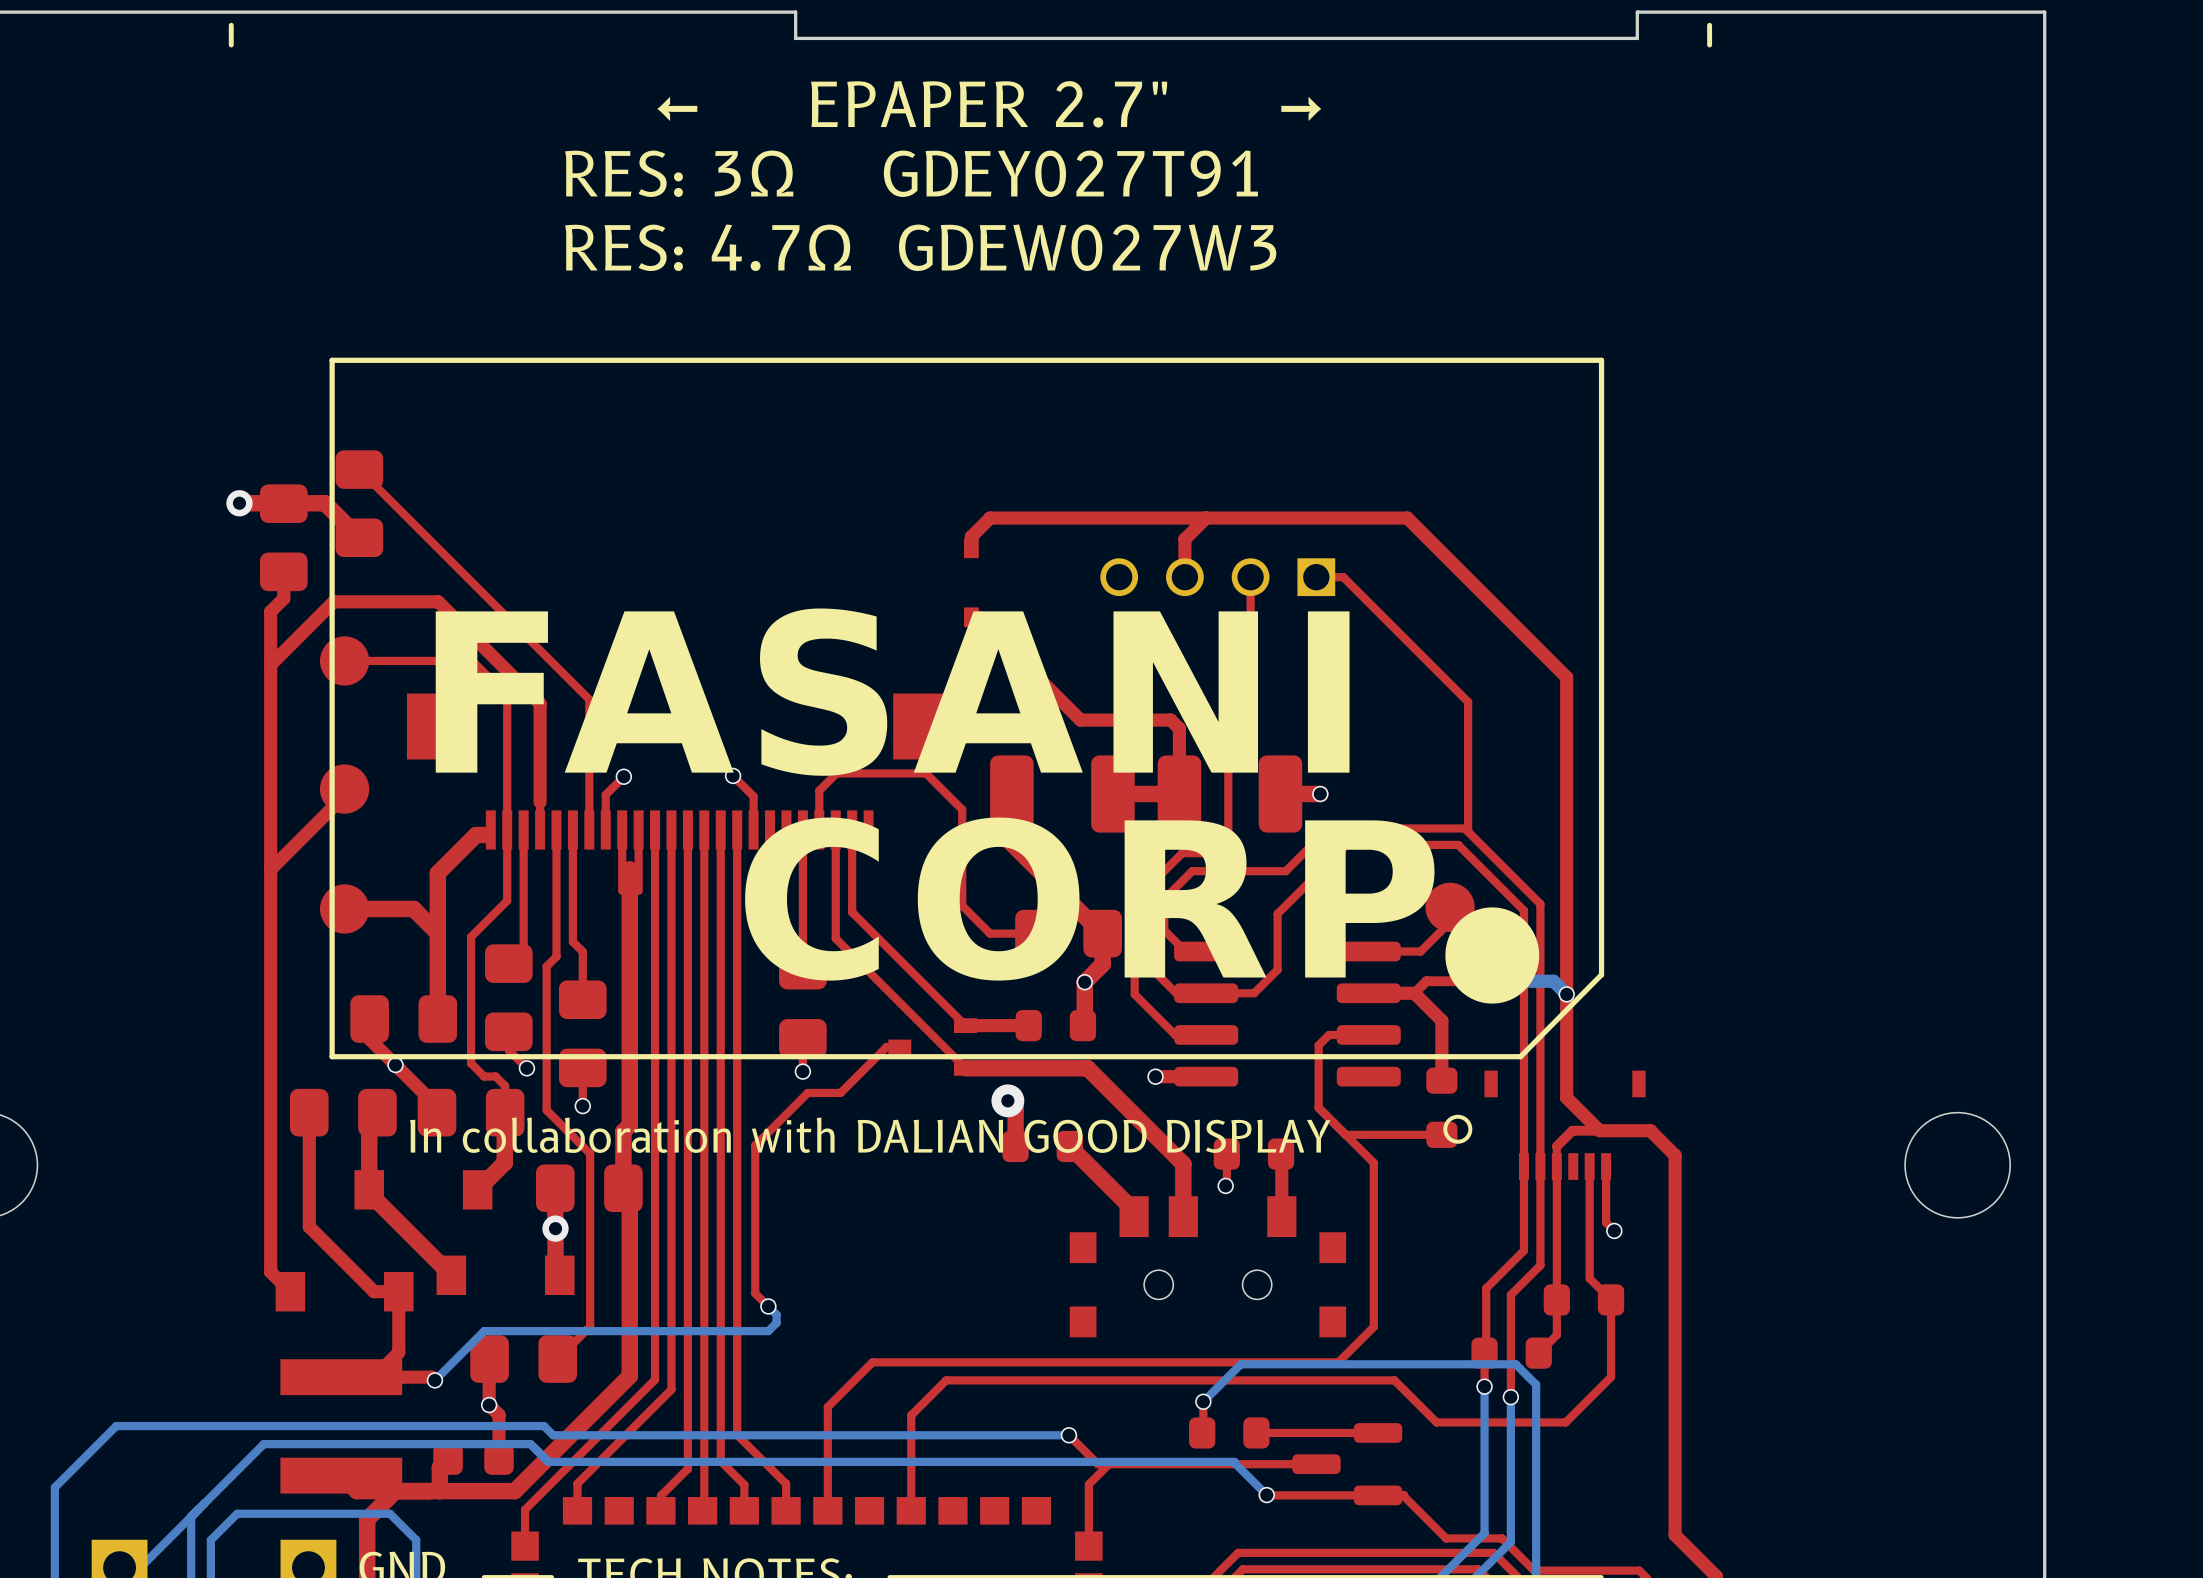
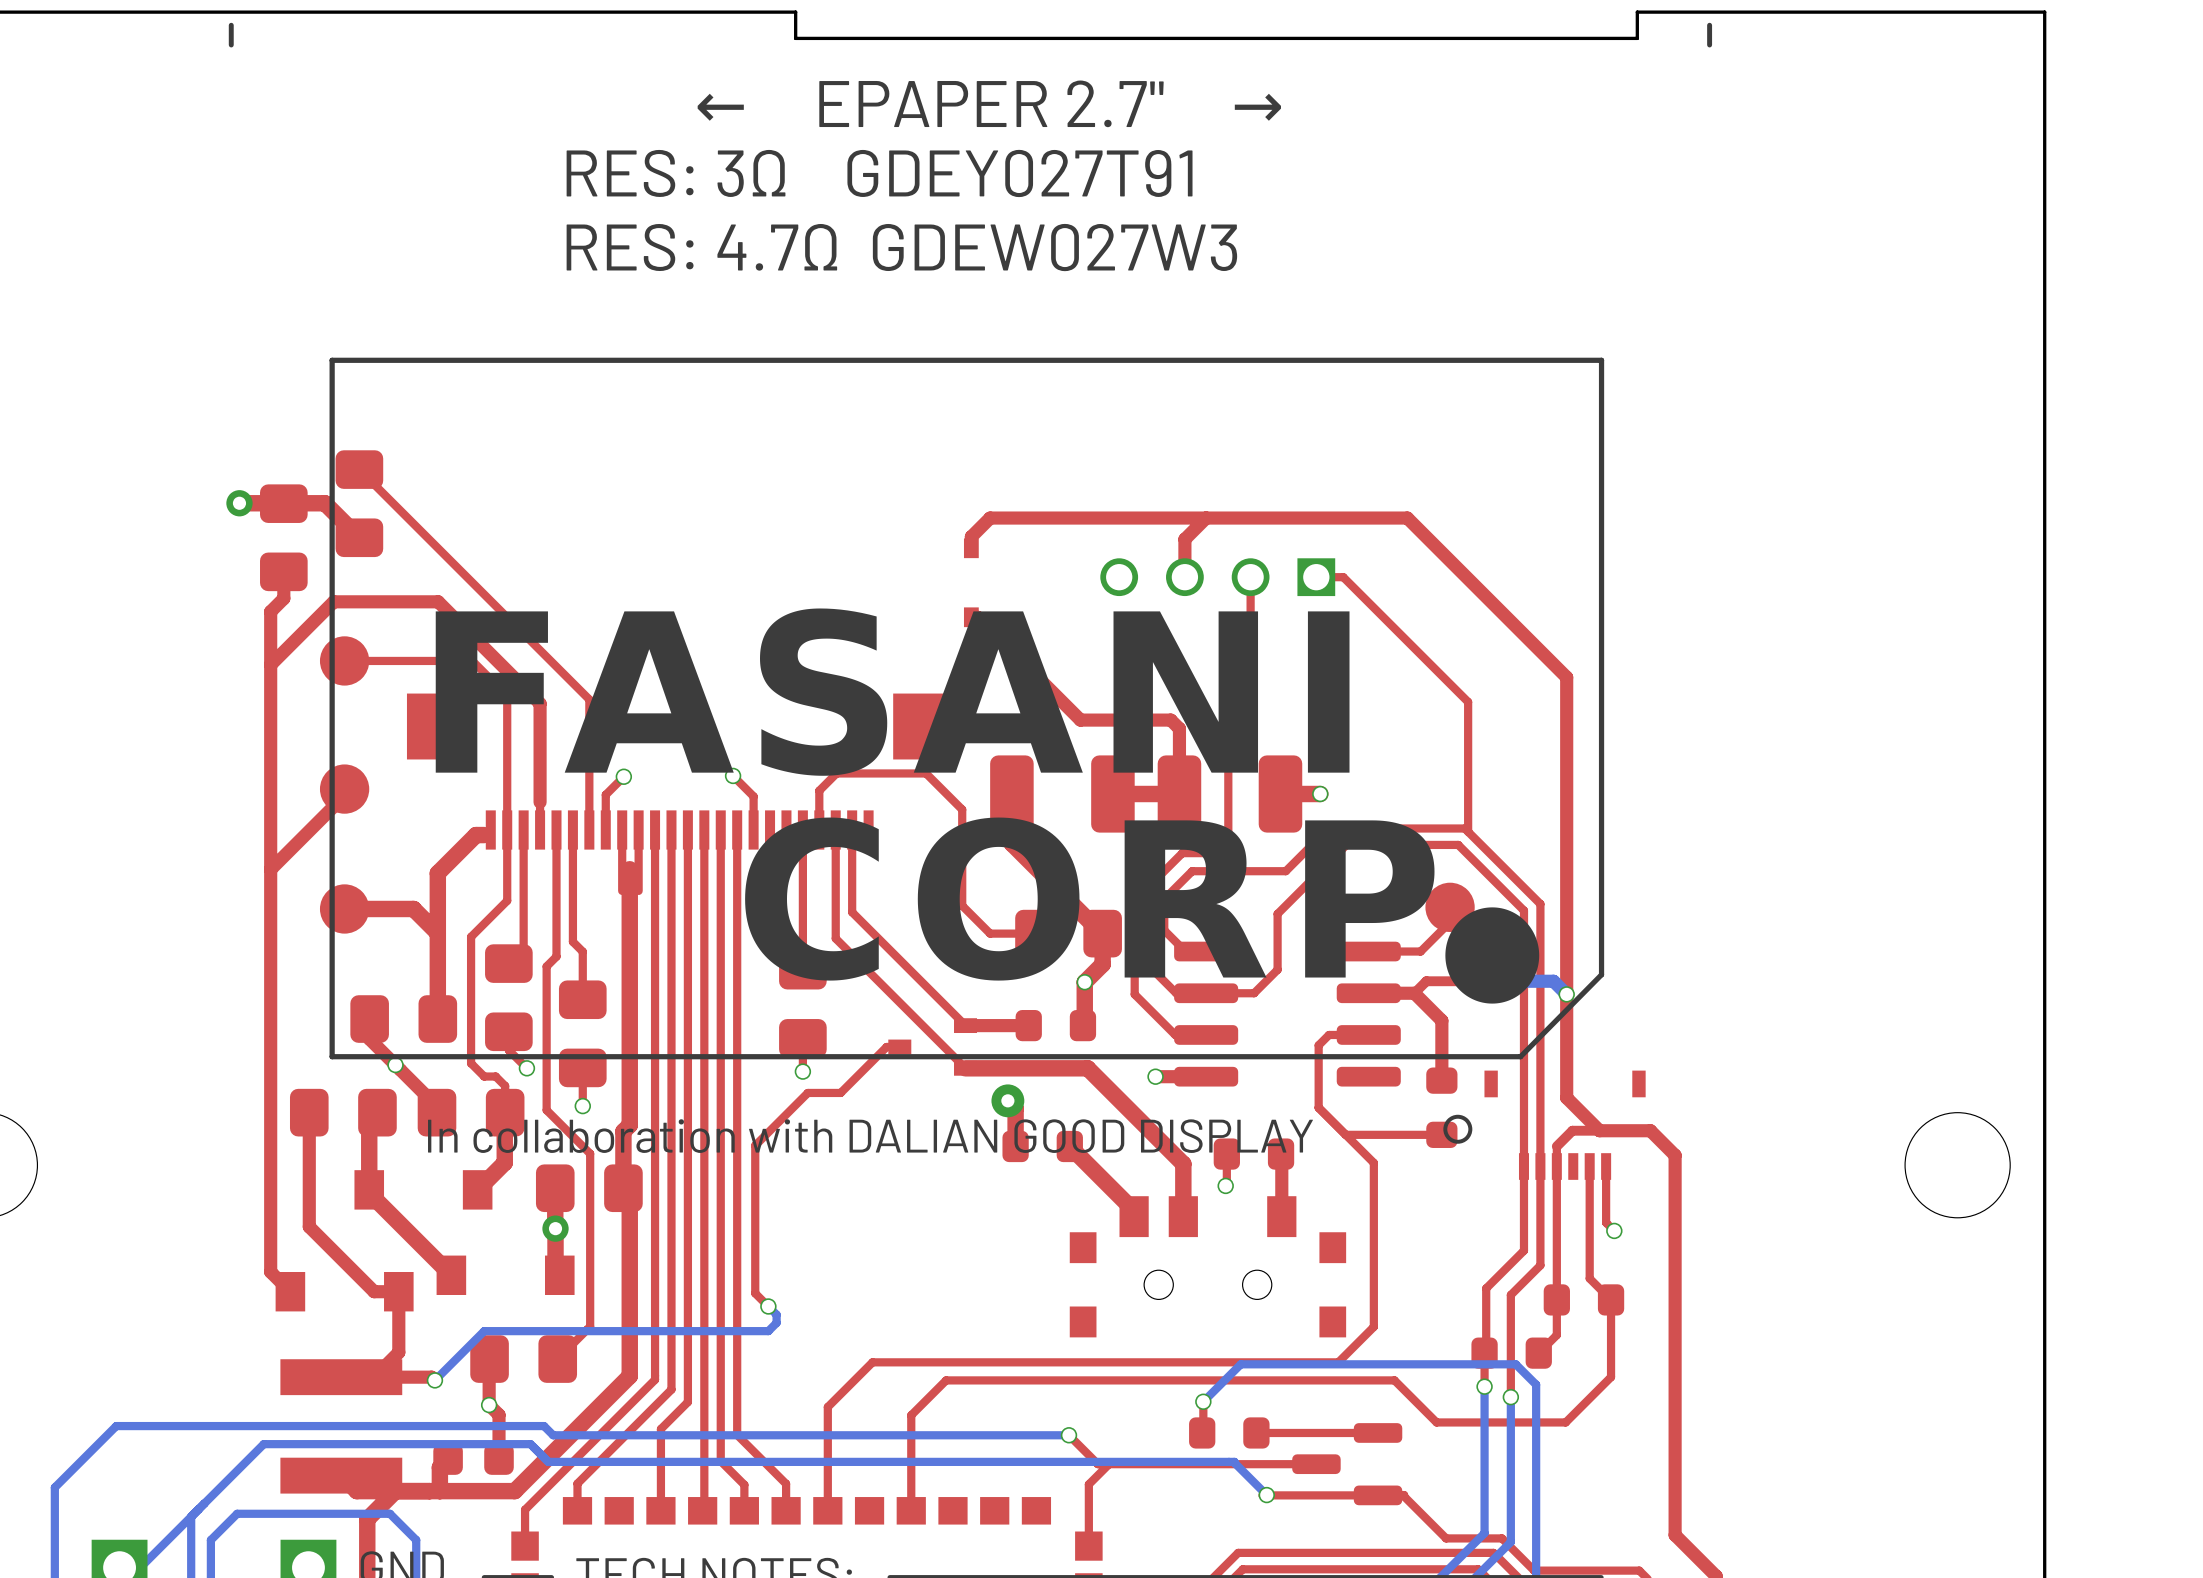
top track: (687, 1402) (687, 1469) -> (687, 1402) (660, 1429) (660, 1495)
top track: (687, 1469) (660, 1495) -> none

